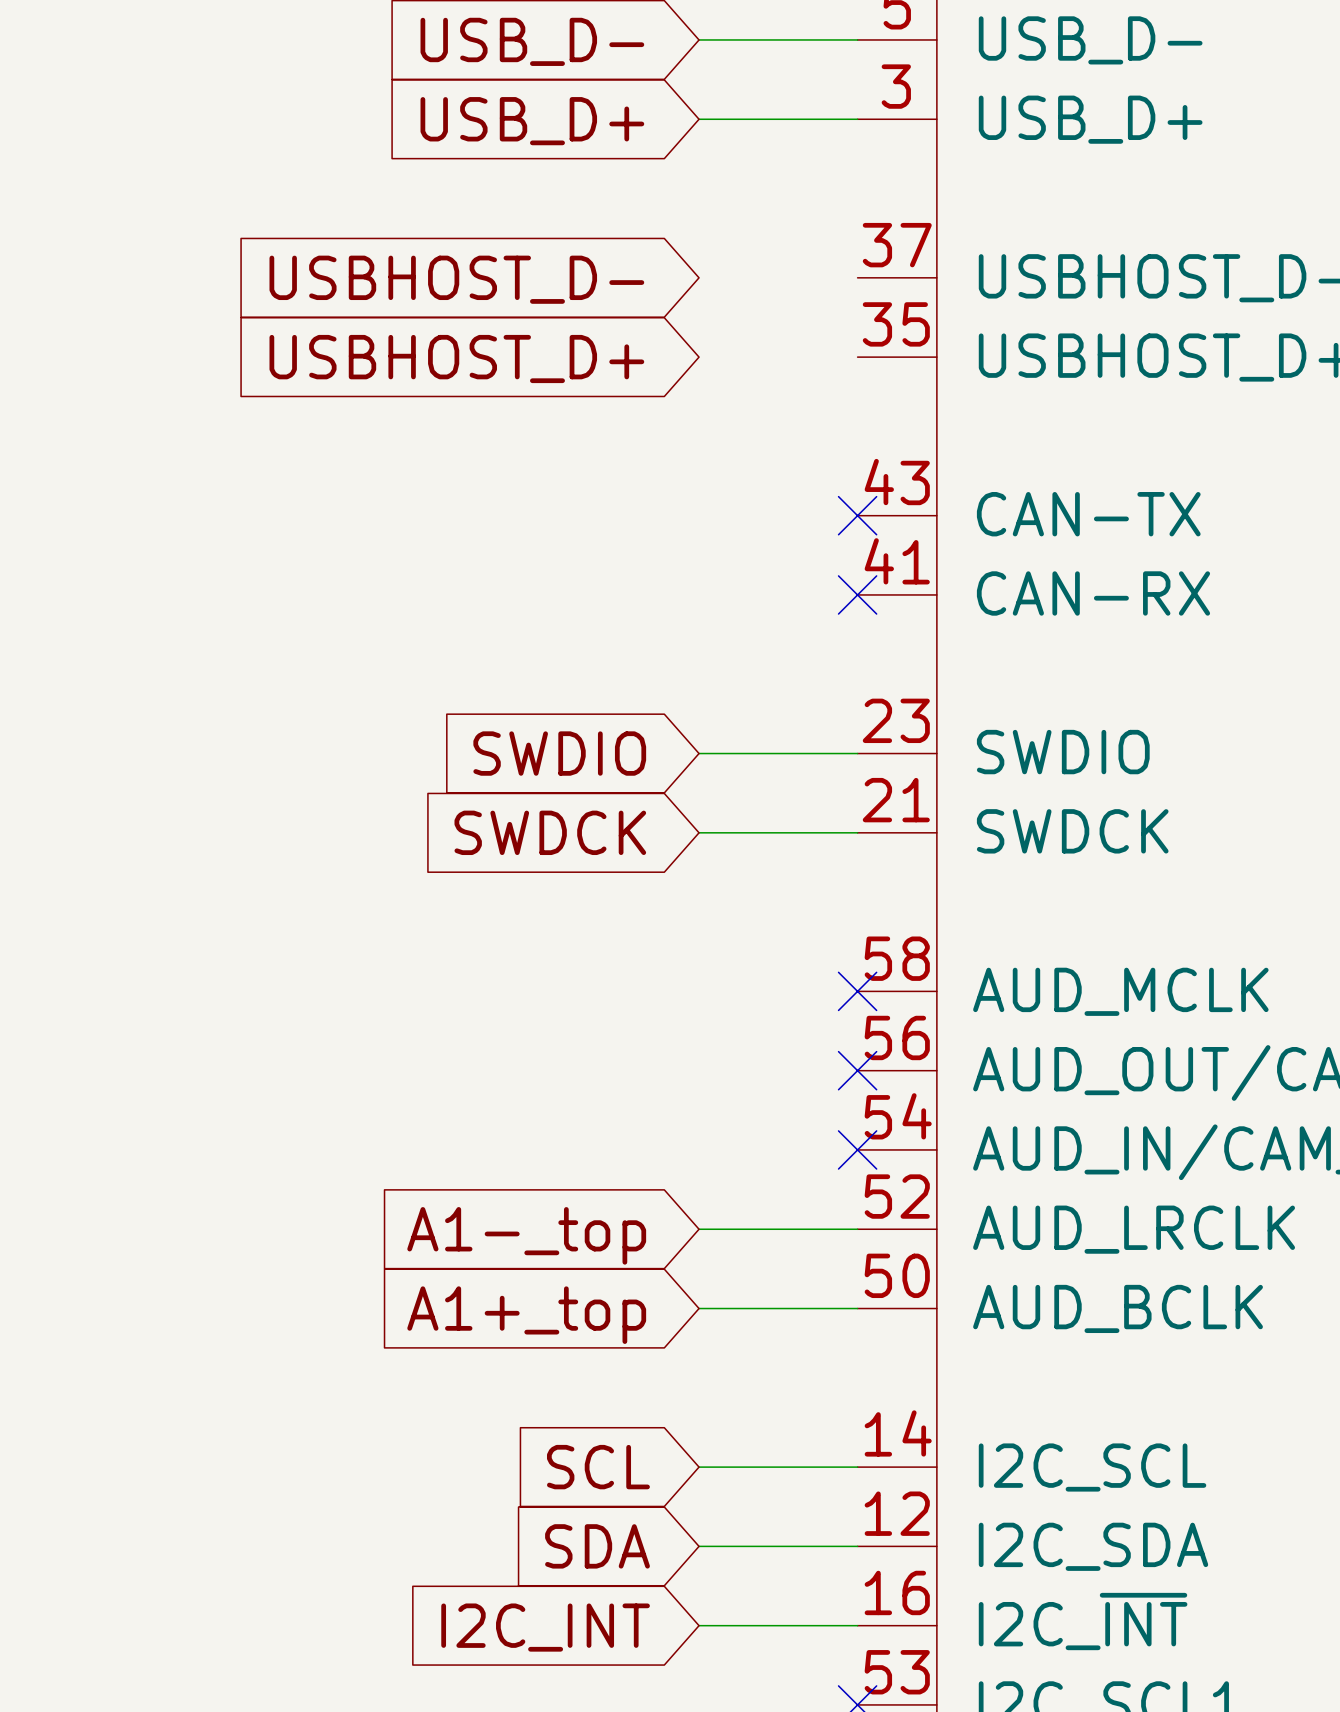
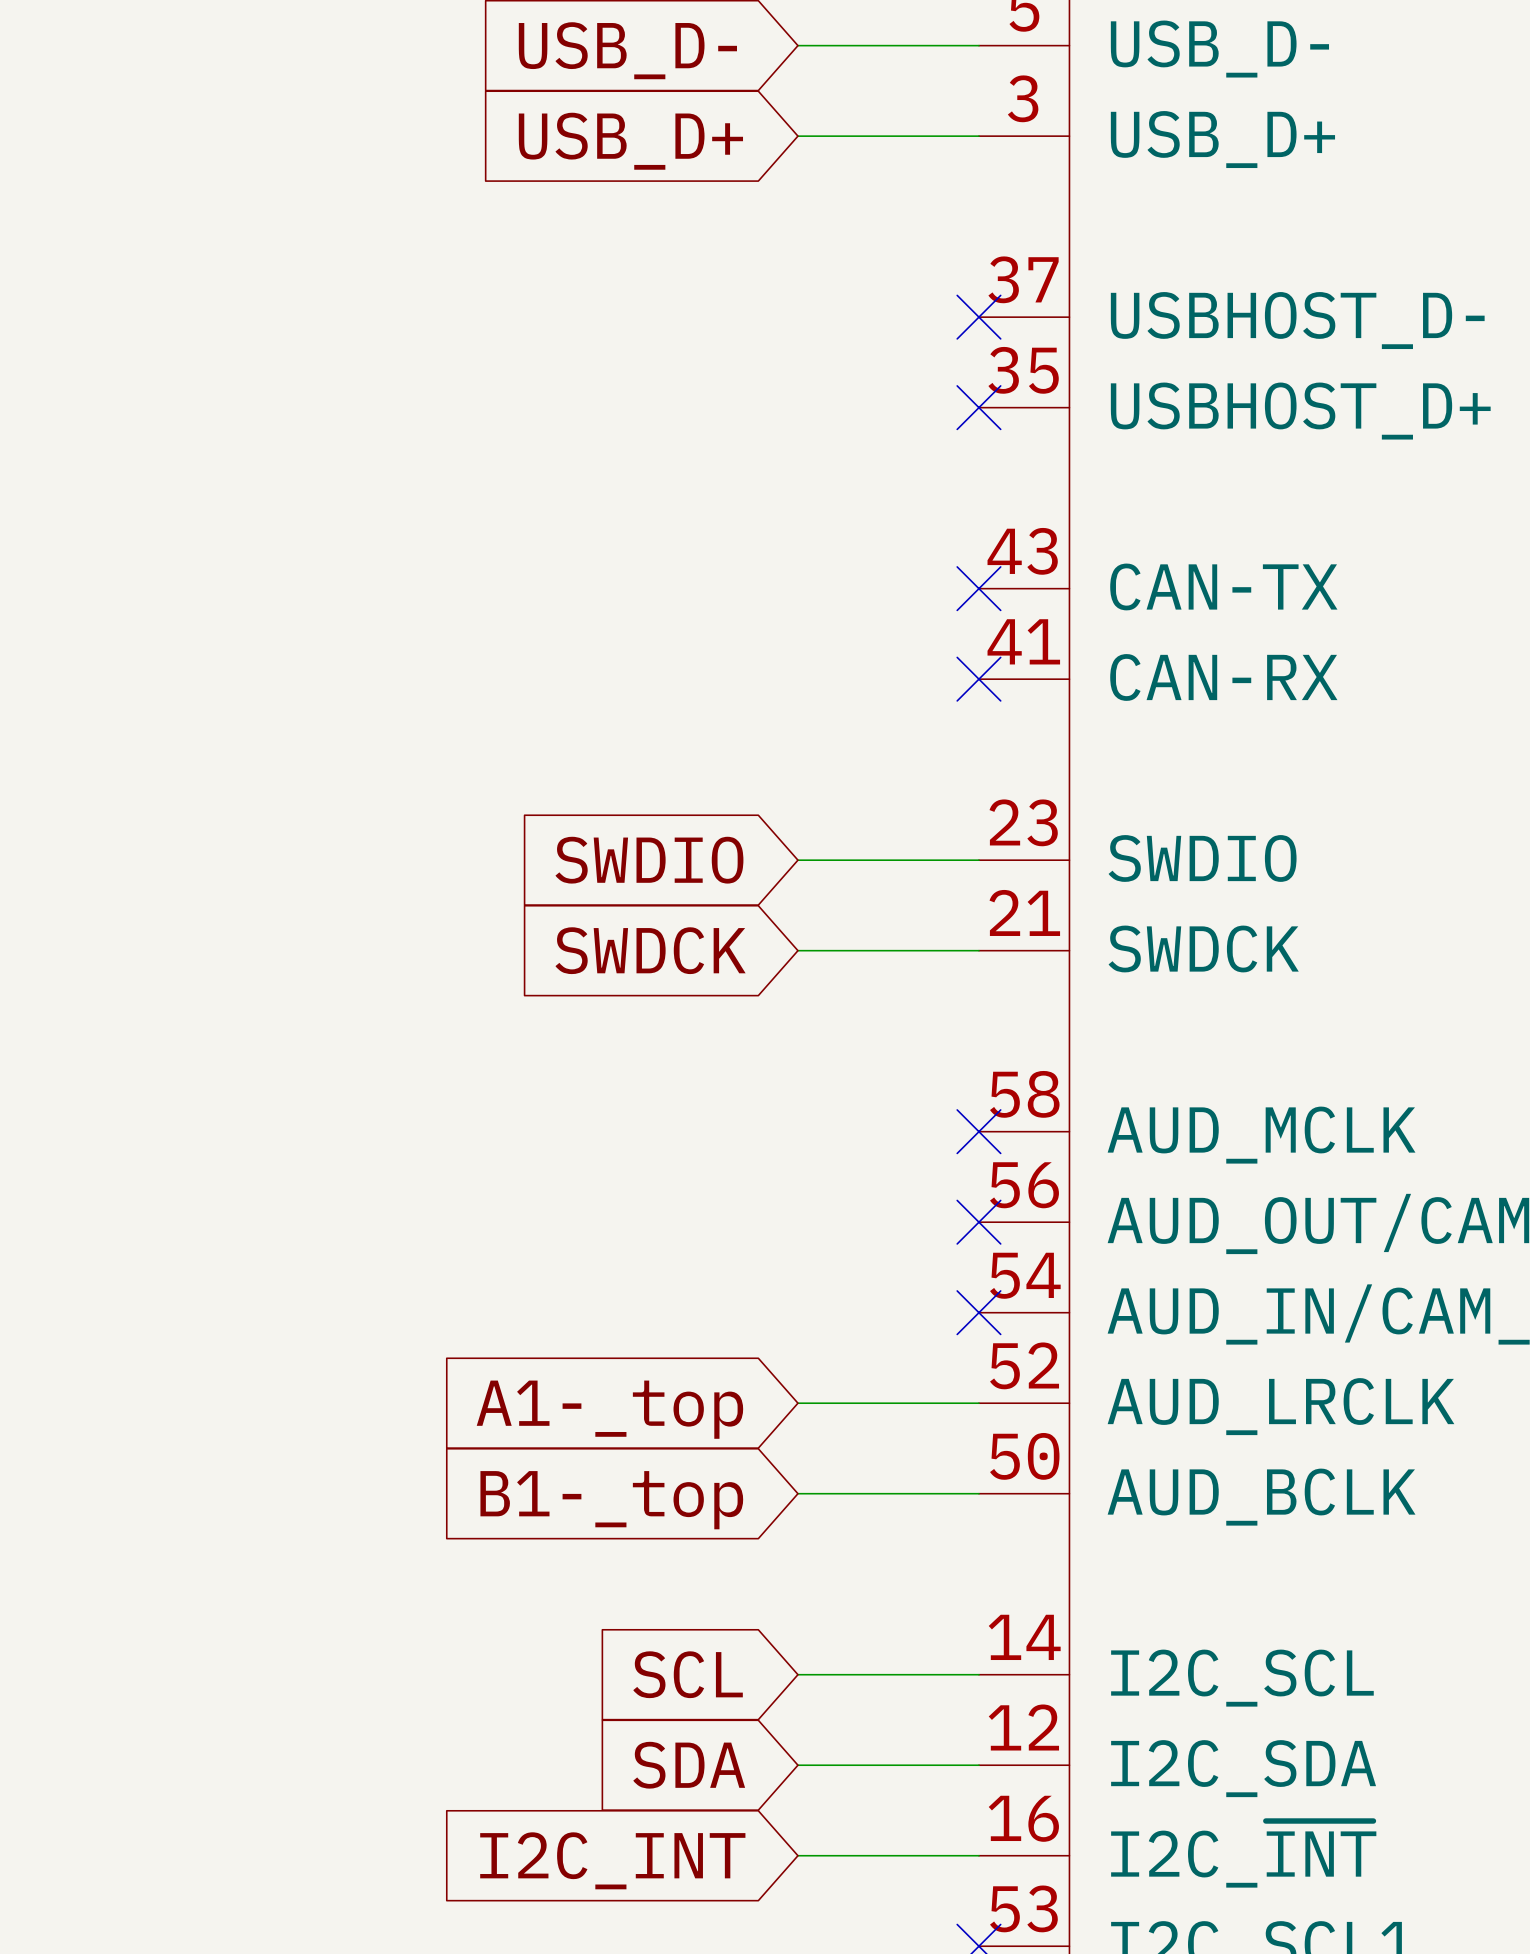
no-connect mark: none -> (978, 317)
global label: USBHOST_D- (456, 279) -> none
no-connect mark: none -> (978, 407)
global label: USBHOST_D+ (456, 359) -> none
global label: A1+_top (526, 1315) -> B1-_top (611, 1500)

